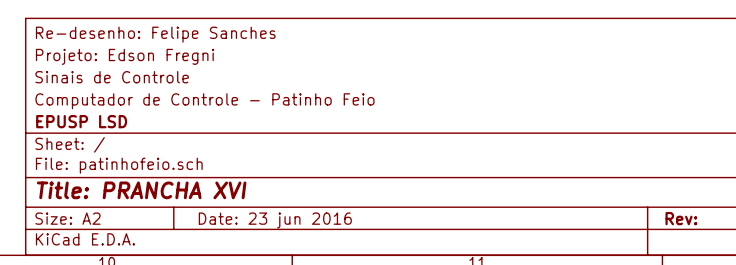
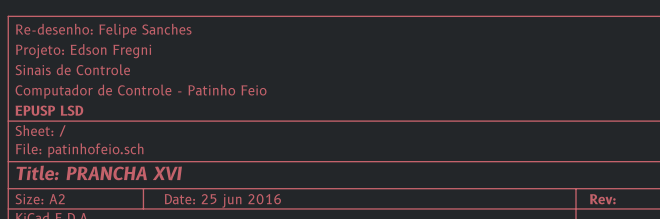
title block: Date: 23 jun 2016 (275, 220) -> Date: 25 jun 2016 (222, 200)

